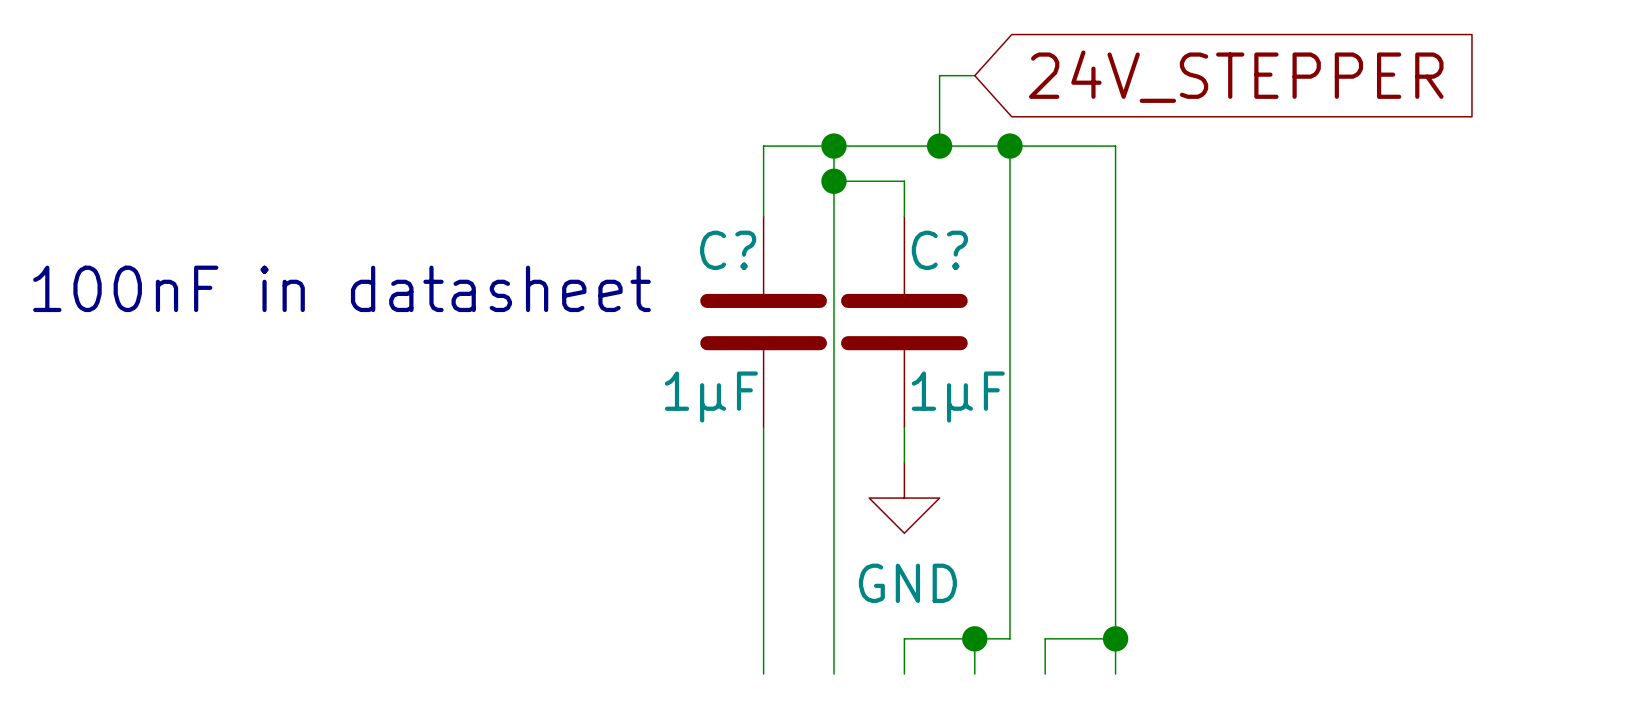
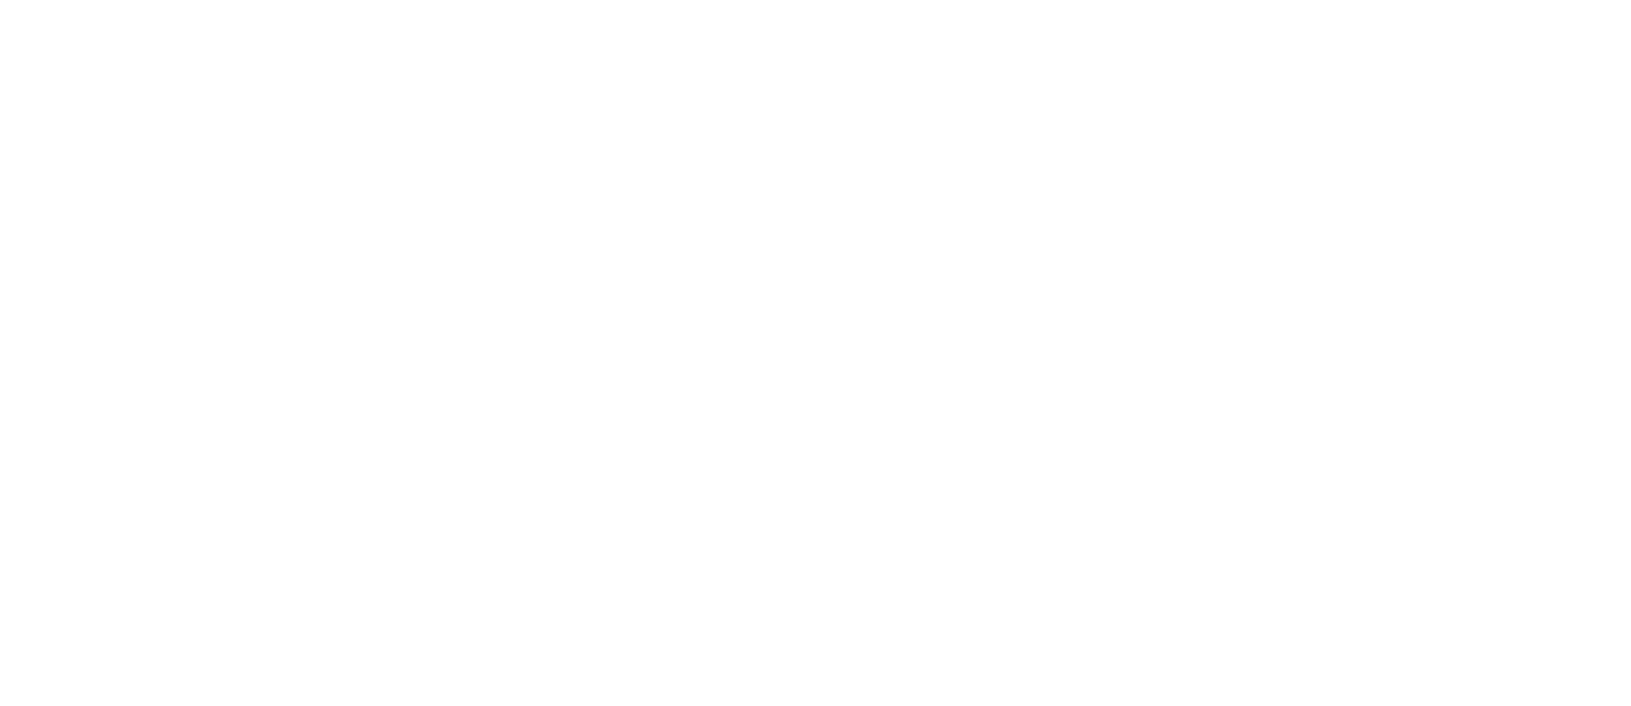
wire: (974, 75) (939, 75) (939, 146) -> none
global label: 24V_STEPPER (1236, 76) -> none
wire: (833, 146) (833, 674) -> none
junction: (833, 146) -> none
junction: (939, 146) -> none
wire: (1009, 146) (1009, 638) (904, 638) (904, 674) -> none
junction: (1009, 146) -> none
wire: (833, 181) (904, 181) (904, 216) -> none
junction: (833, 181) -> none
wire: (763, 216) (763, 146) (1115, 146) (1115, 674) -> none
text: 100nF in datasheet (341, 288) -> none
C?: 1μF (763, 322) -> none
C?: 1μF (904, 322) -> none
wire: (763, 427) (763, 674) -> none
wire: (904, 427) (904, 462) -> none
power symbol: GND (904, 498) -> none
wire: (974, 638) (974, 674) -> none
junction: (974, 638) -> none
wire: (1115, 638) (1045, 638) (1045, 674) -> none
junction: (1115, 638) -> none

